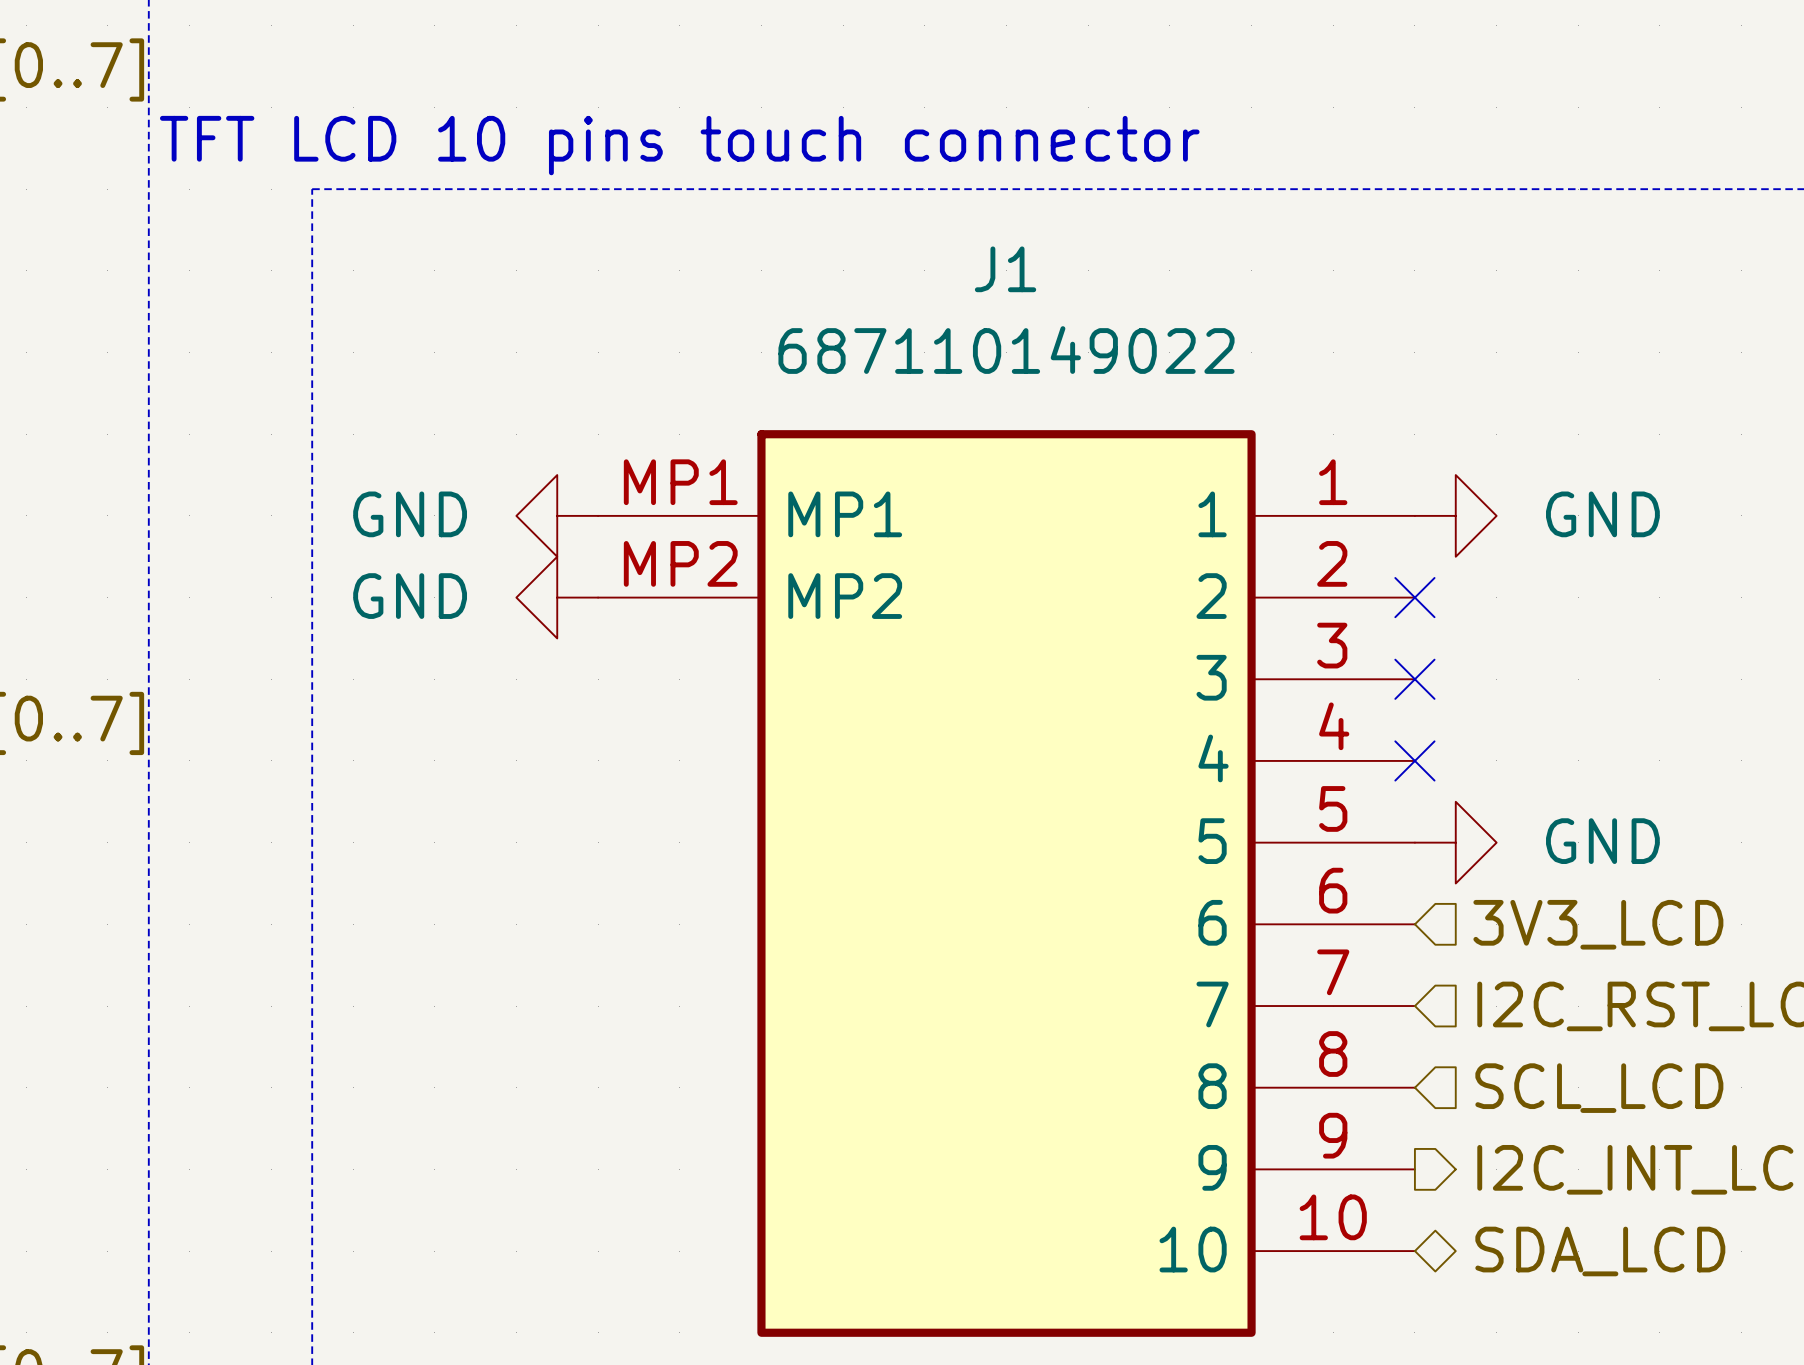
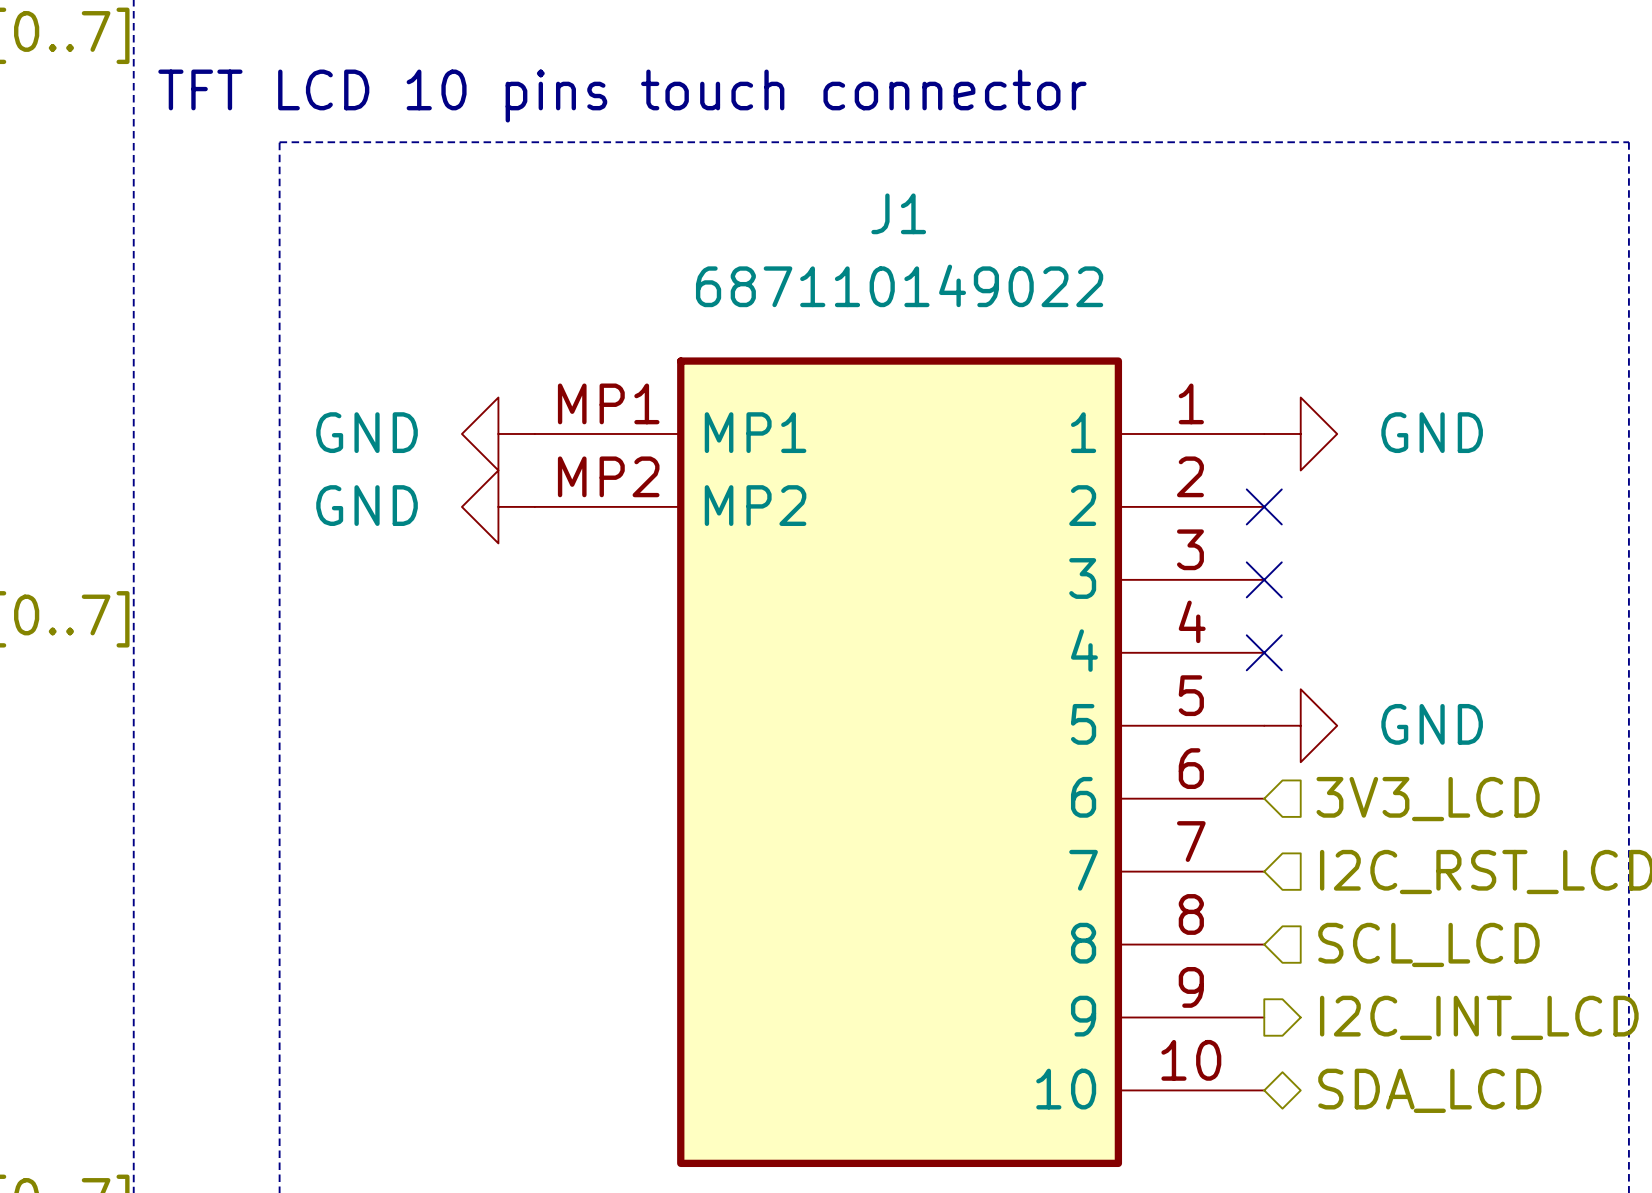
text position: TFT LCD 10 pins touch connector (679, 145) -> TFT LCD 10 pins touch connector (622, 96)

